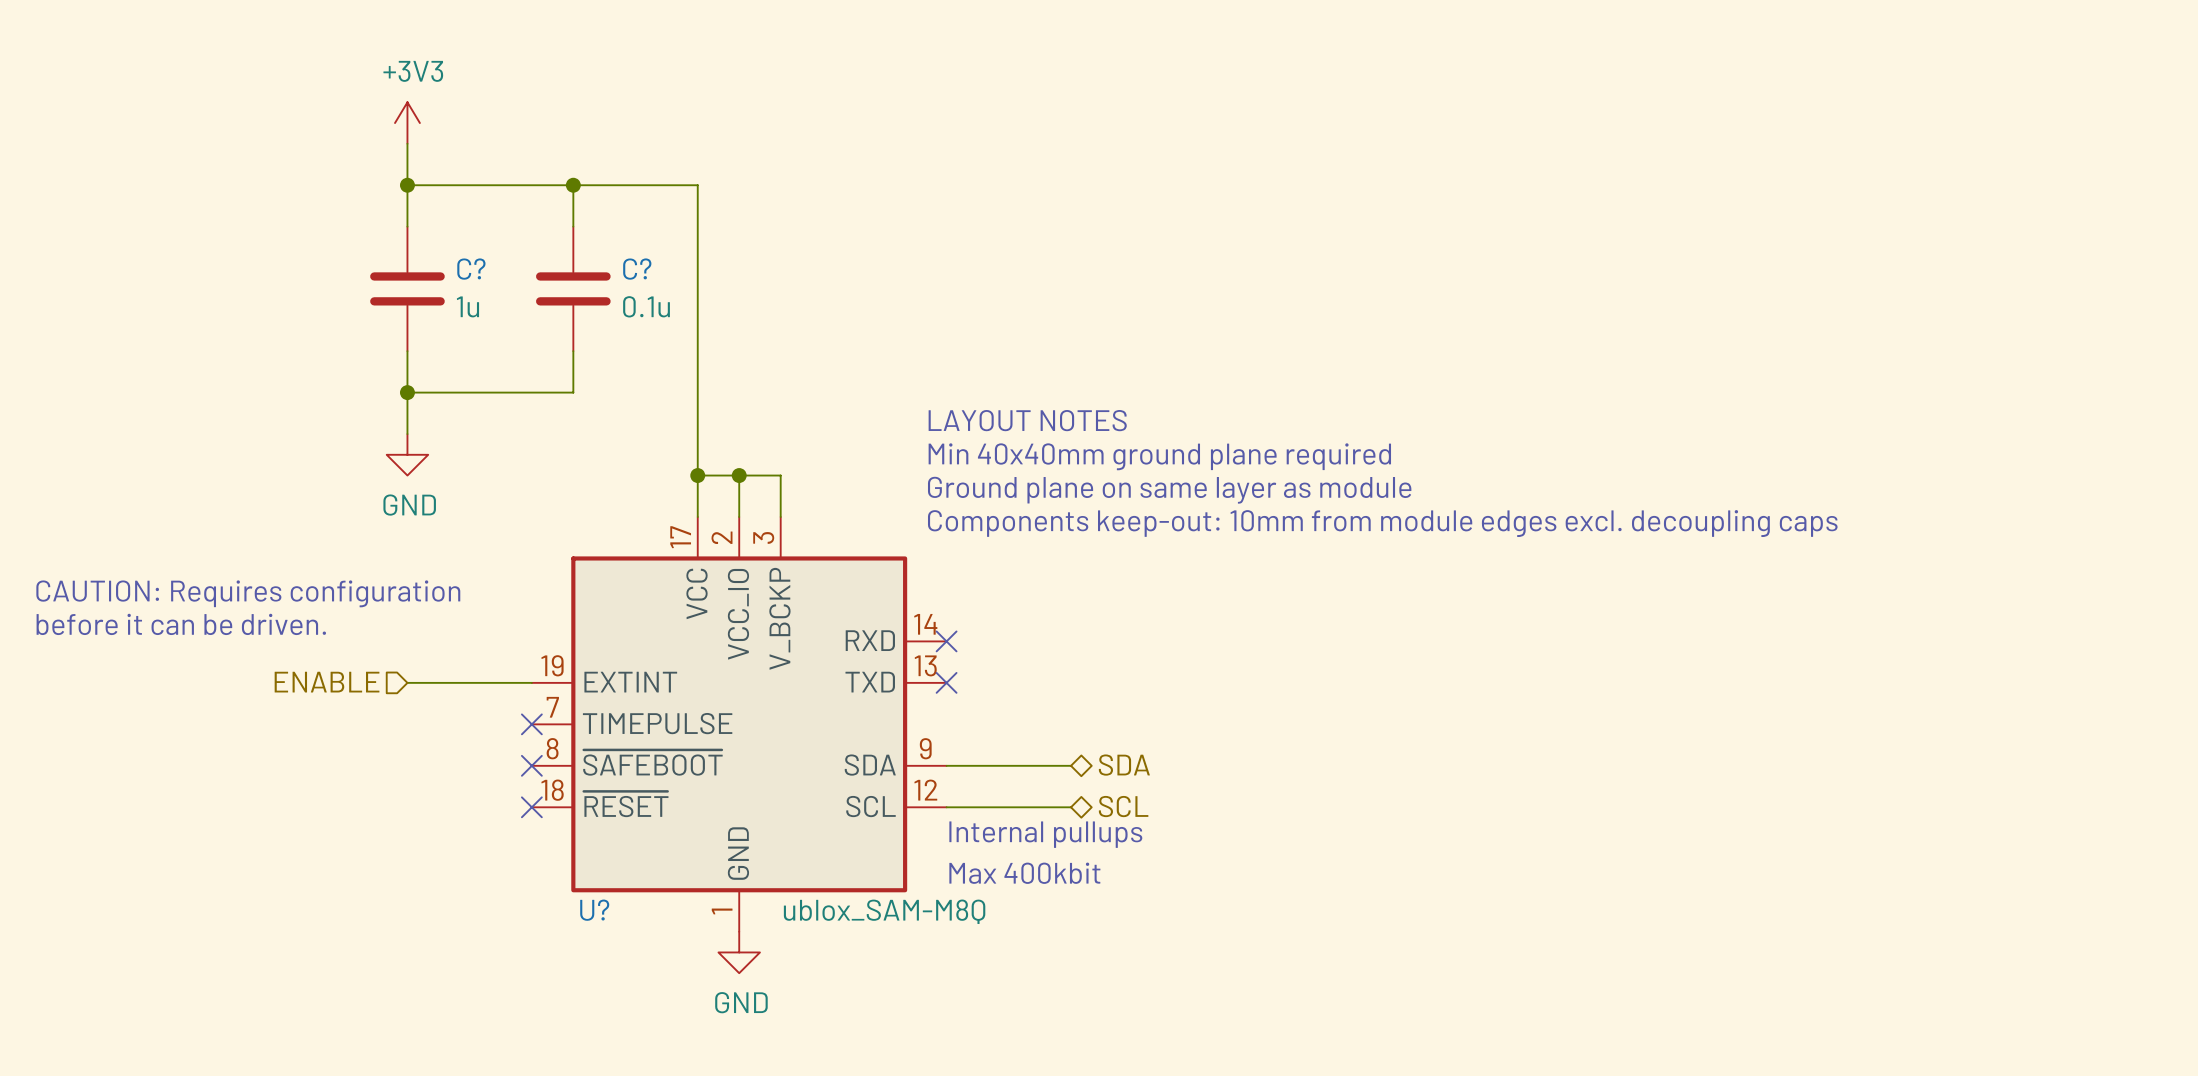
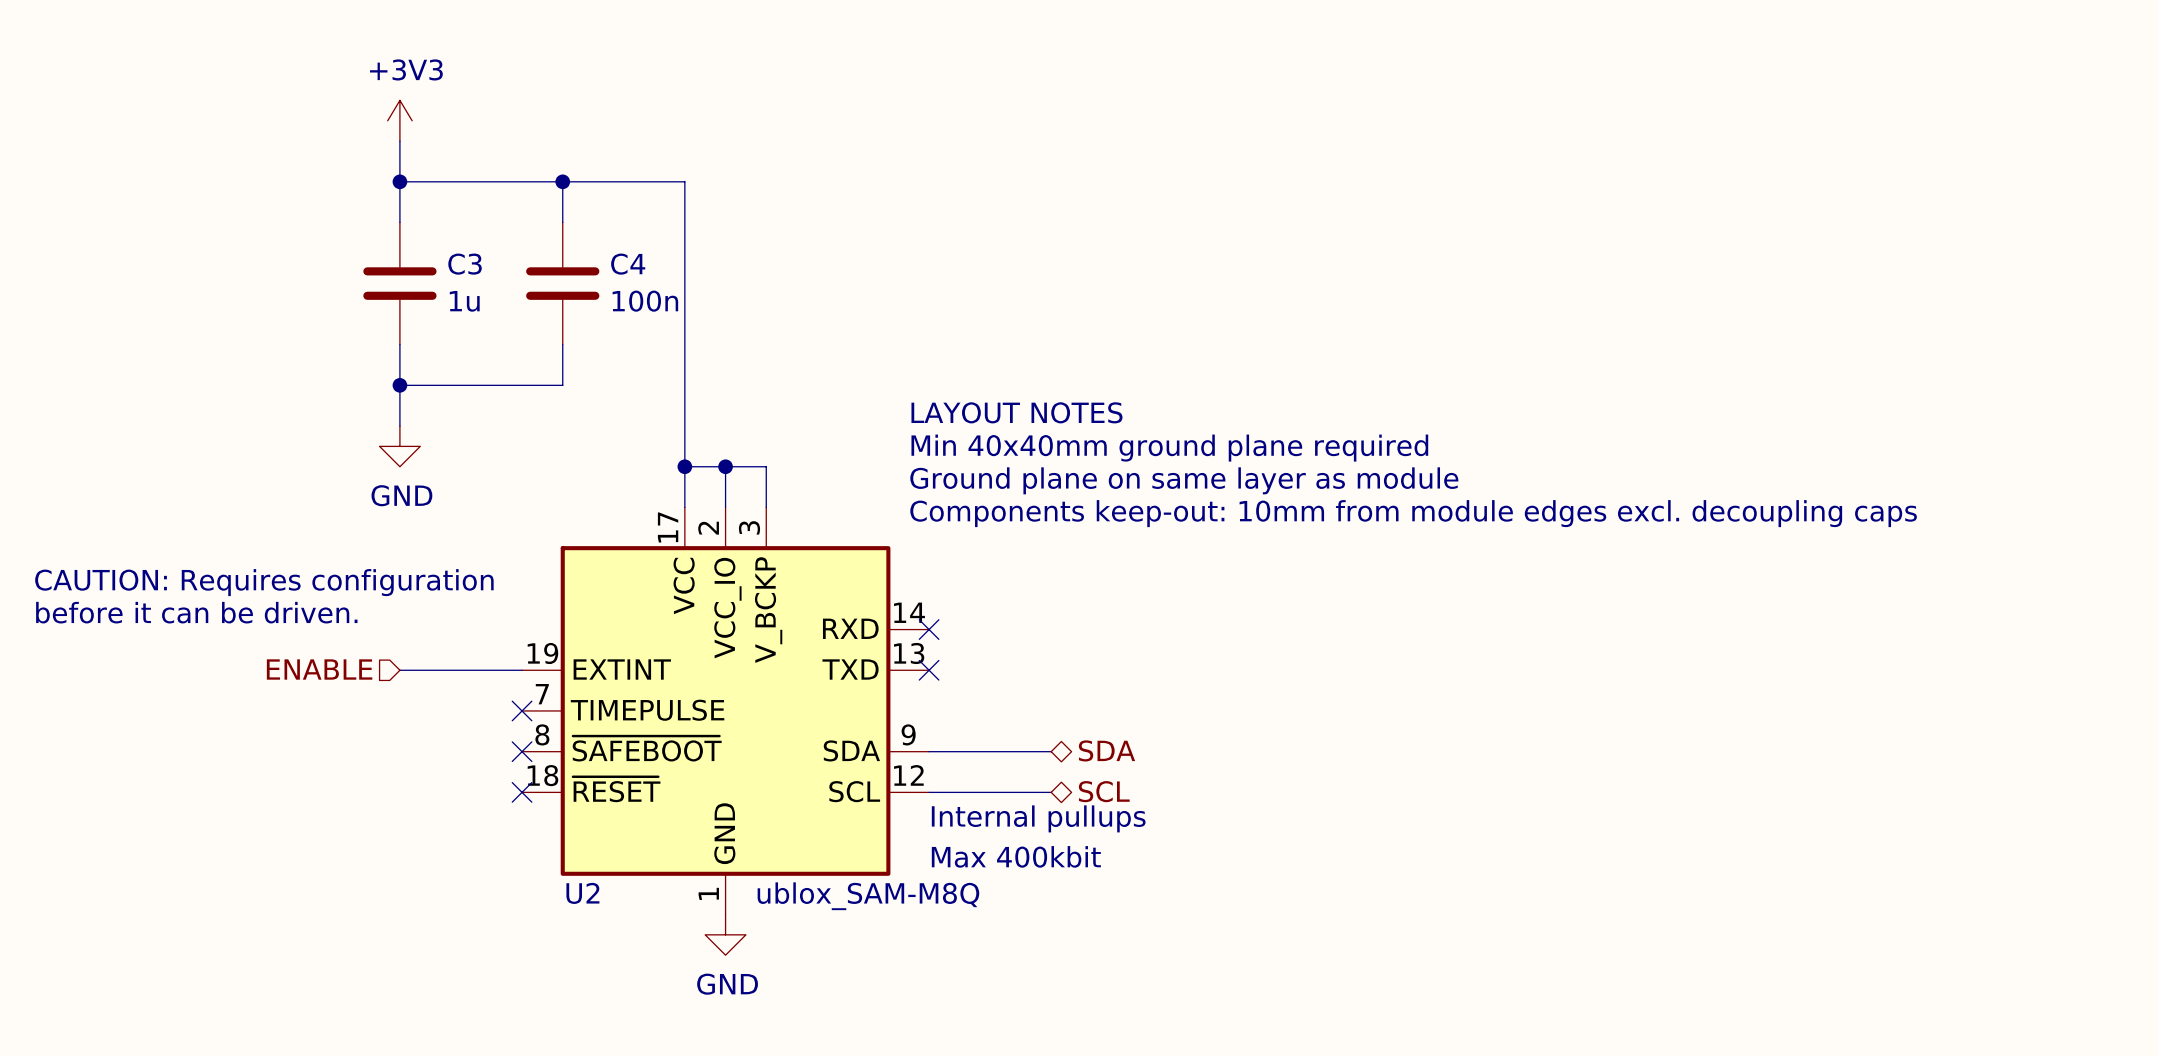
C? name: C? (471, 269) -> C3 (465, 264)
C? name: C? (637, 269) -> C4 (628, 264)
C? value: 0.1u (646, 306) -> 100n (645, 301)
U? name: U? (594, 910) -> U2 (582, 893)

